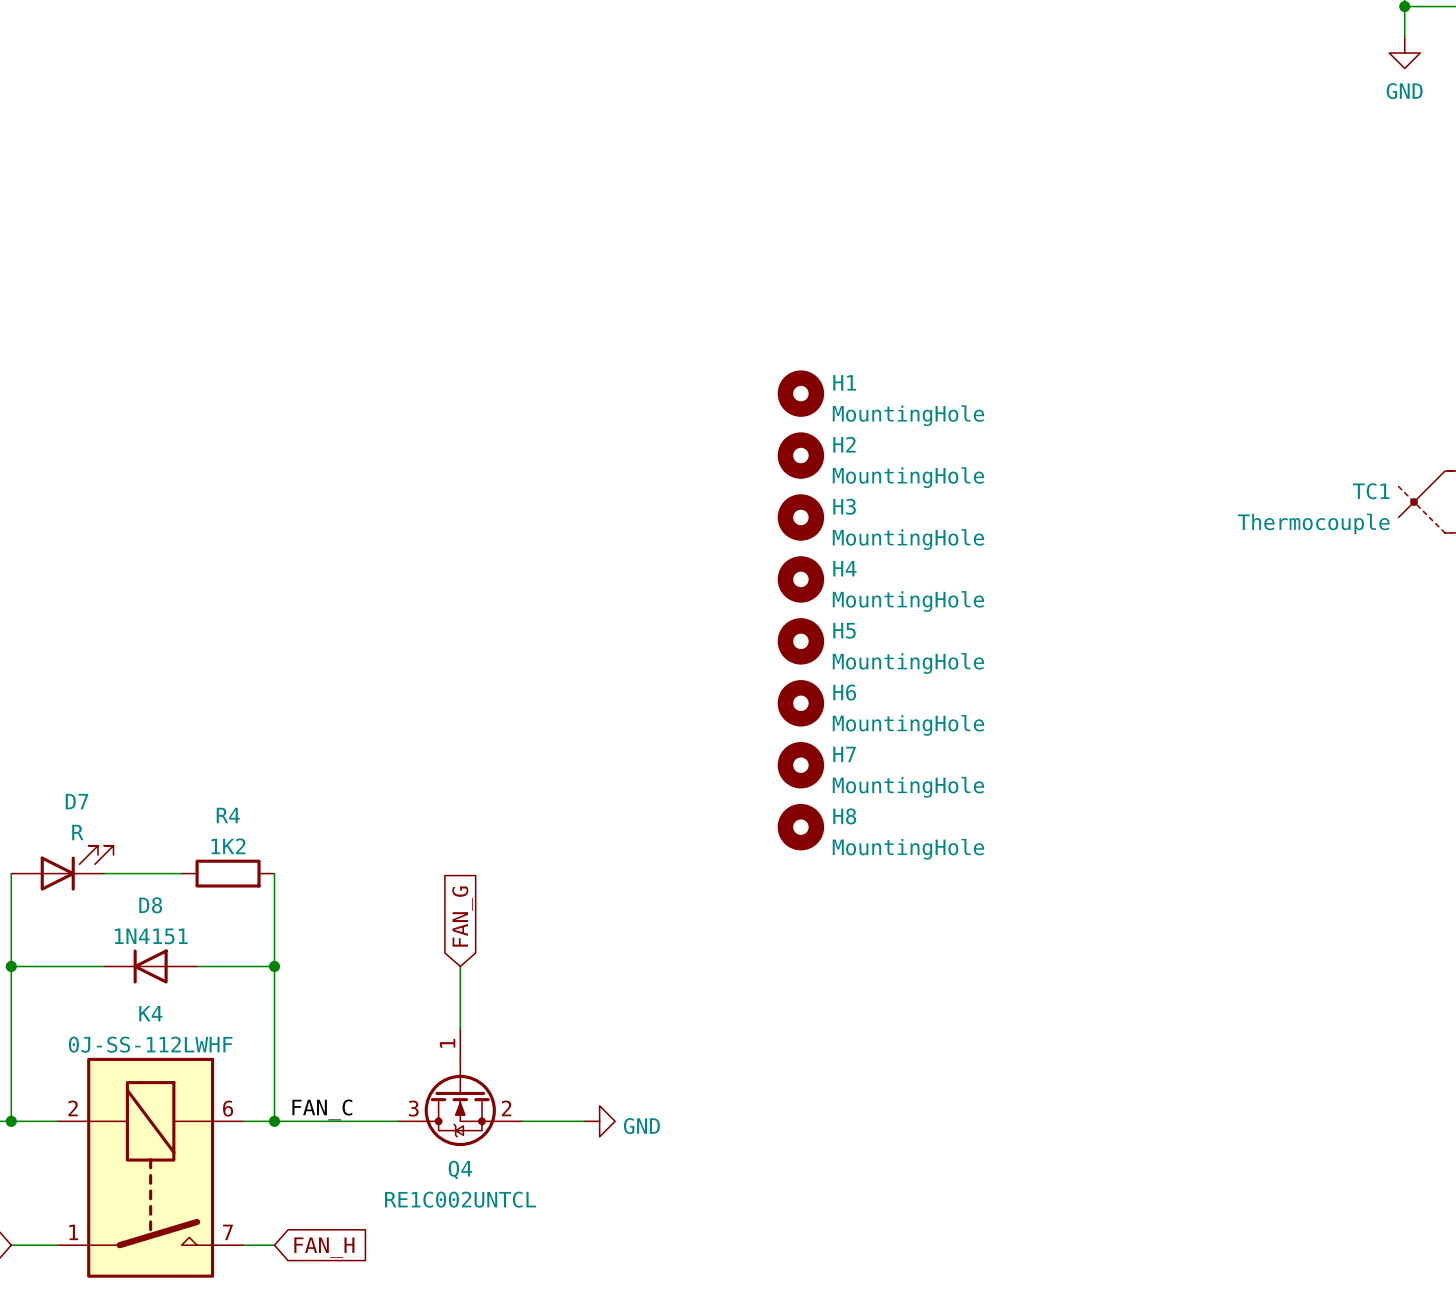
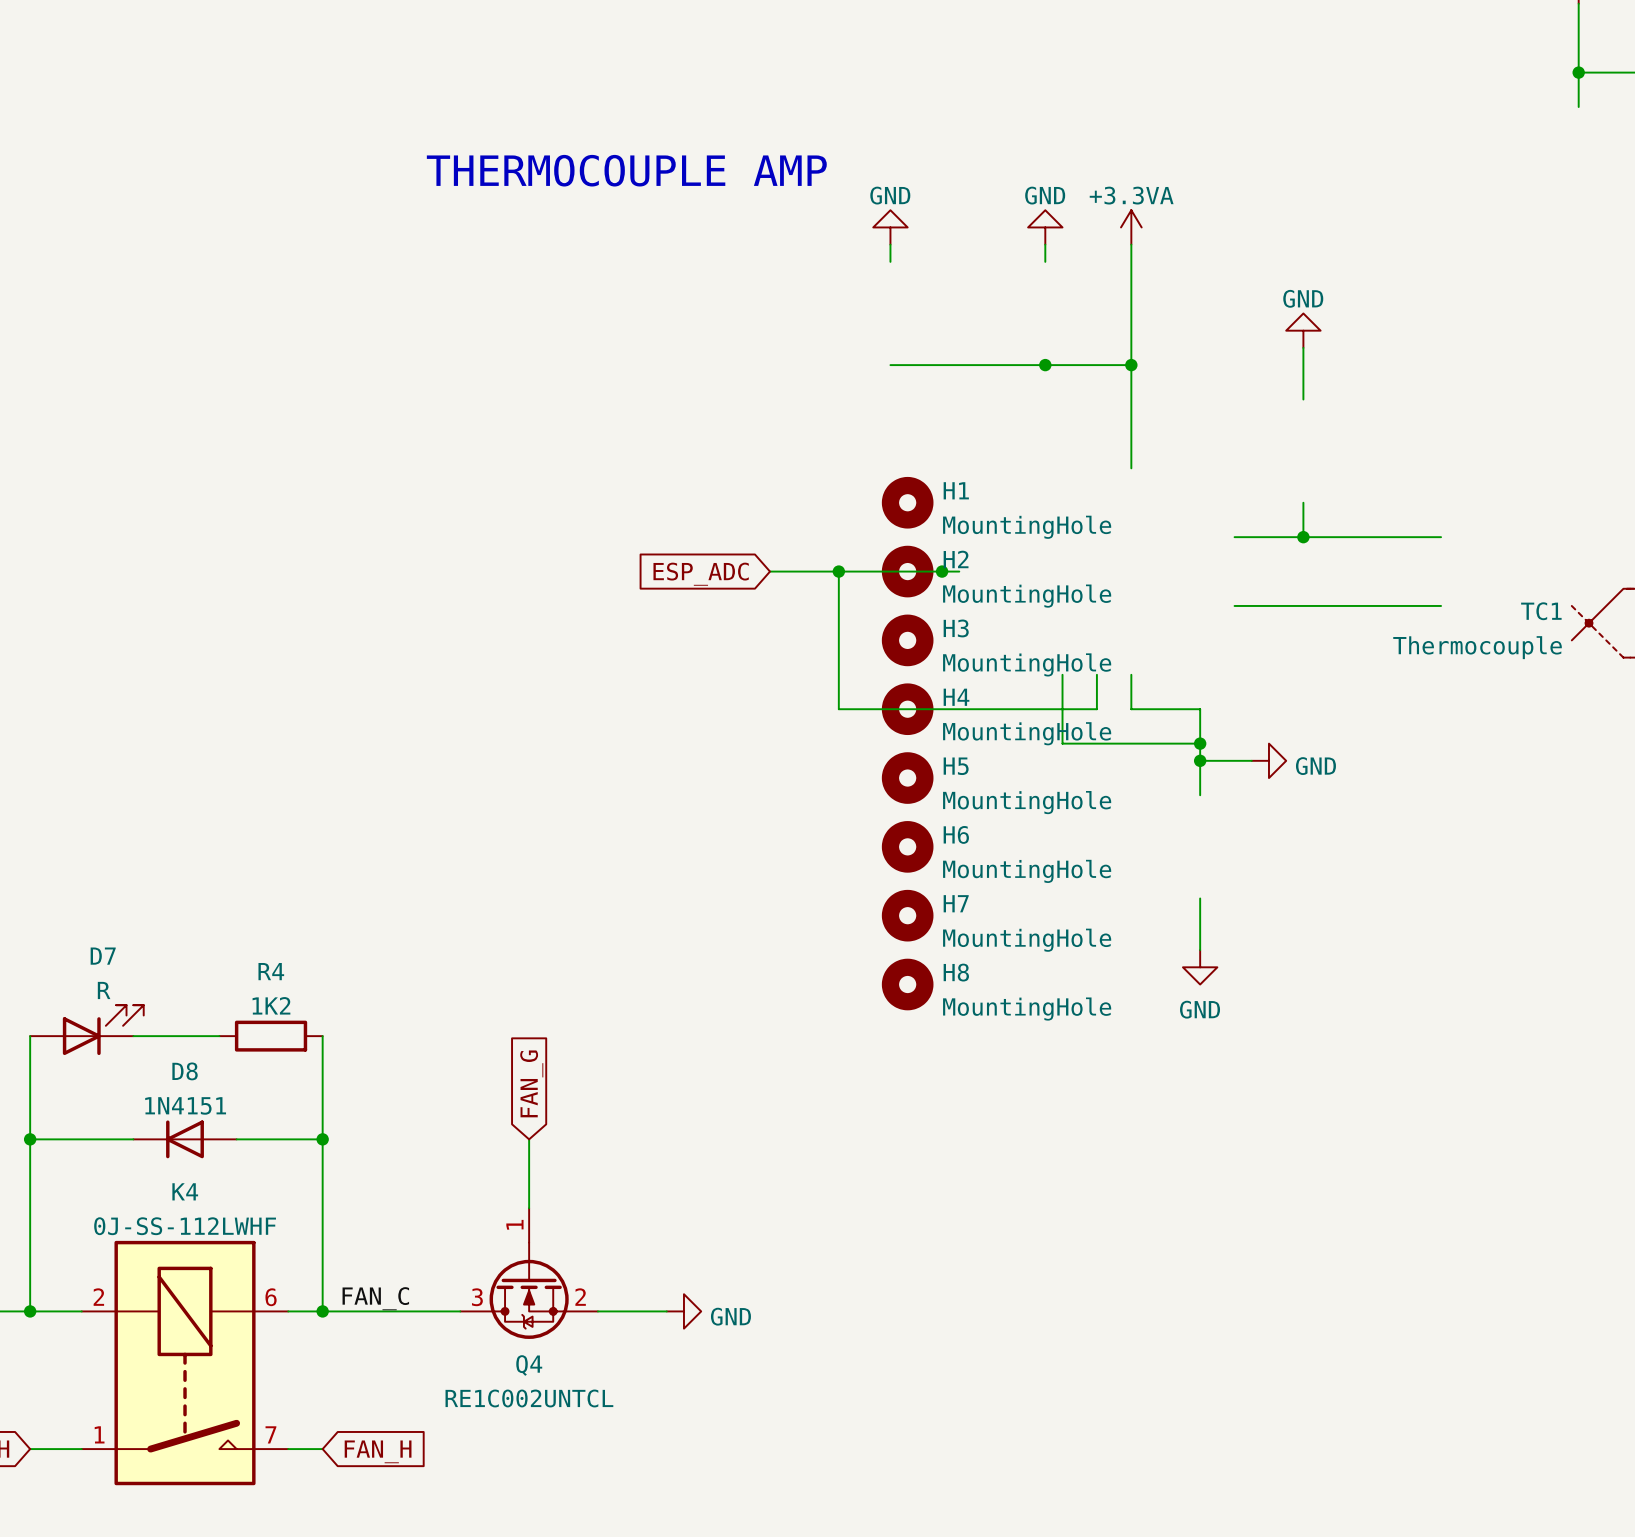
power symbol: GND (1404, 53) -> none
text: none -> THERMOCOUPLE AMP (626, 170)
power symbol: none -> GND (890, 227)
power symbol: none -> GND (1045, 227)
power symbol: none -> +3.3VA (1131, 227)
wire: none -> (890, 244) (890, 261)
wire: none -> (1045, 244) (1045, 261)
wire: none -> (1131, 244) (1131, 468)
power symbol: none -> GND (1303, 330)
wire: none -> (1303, 347) (1303, 399)
wire: none -> (890, 365) (1131, 365)
junction: none -> (1045, 365)
junction: none -> (1131, 365)
wire: none -> (1303, 502) (1303, 537)
wire: none -> (1234, 537) (1441, 537)
junction: none -> (1303, 537)
wire: none -> (770, 571) (959, 571)
wire: none -> (838, 571) (838, 709) (1096, 709) (1096, 674)
junction: none -> (838, 571)
junction: none -> (942, 571)
global label: none -> ESP_ADC (701, 574)
wire: none -> (1234, 605) (1441, 605)
wire: none -> (1062, 674) (1062, 743) (1200, 743)
wire: none -> (1131, 674) (1131, 709) (1200, 709) (1200, 795)
junction: none -> (1200, 743)
wire: none -> (1200, 760) (1251, 760)
junction: none -> (1200, 760)
power symbol: none -> GND (1268, 760)
wire: none -> (1200, 898) (1200, 950)
power symbol: none -> GND (1200, 967)

